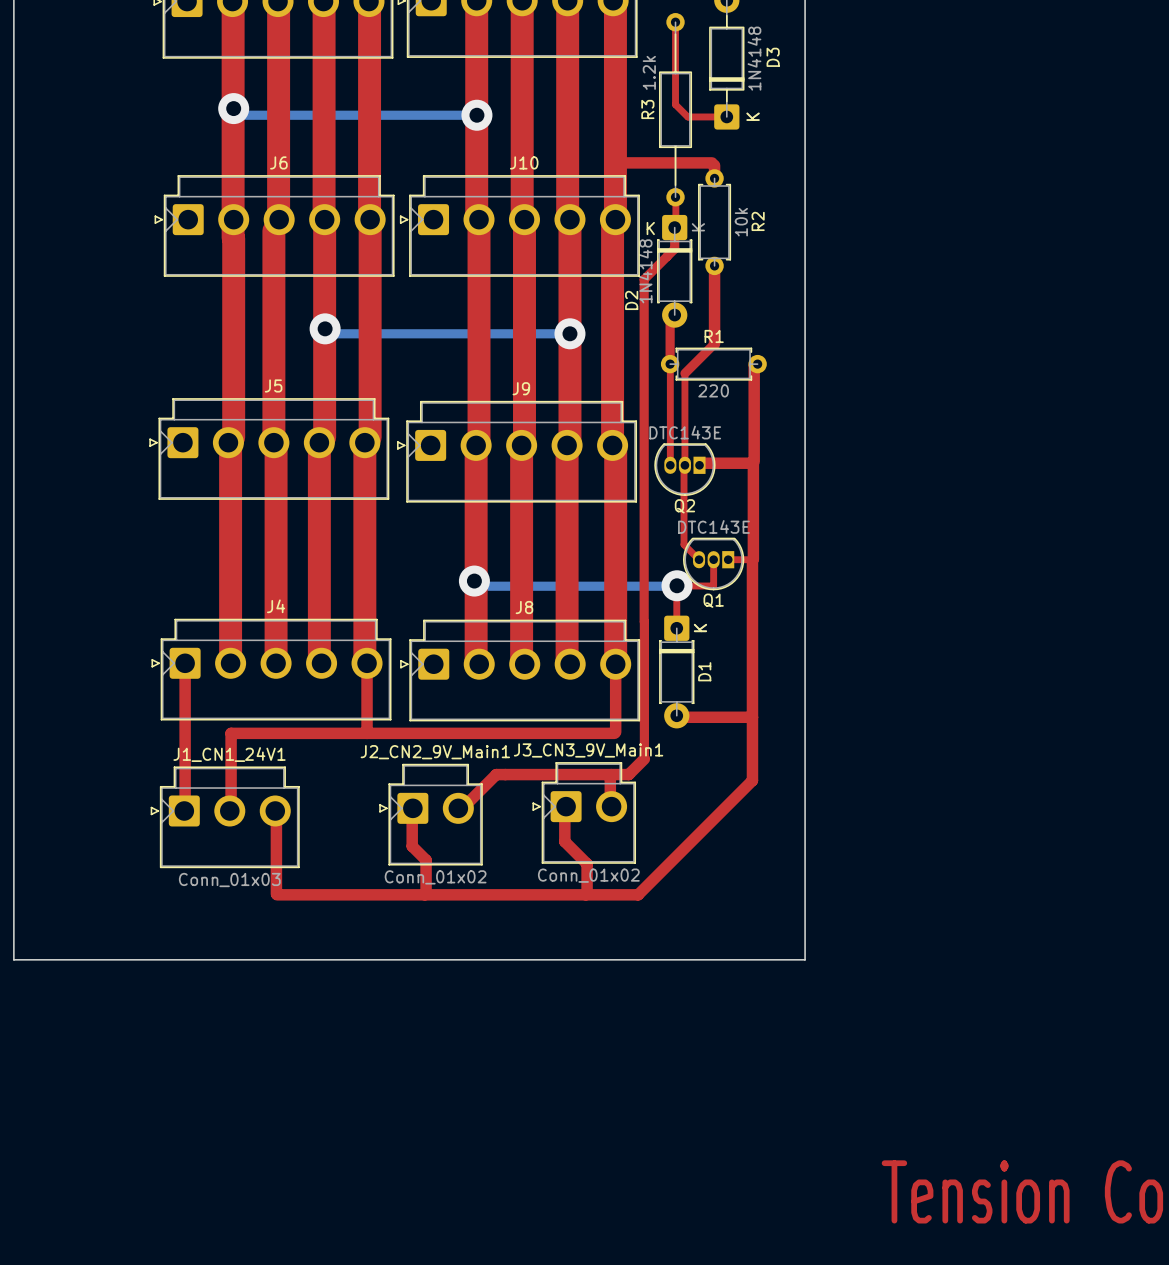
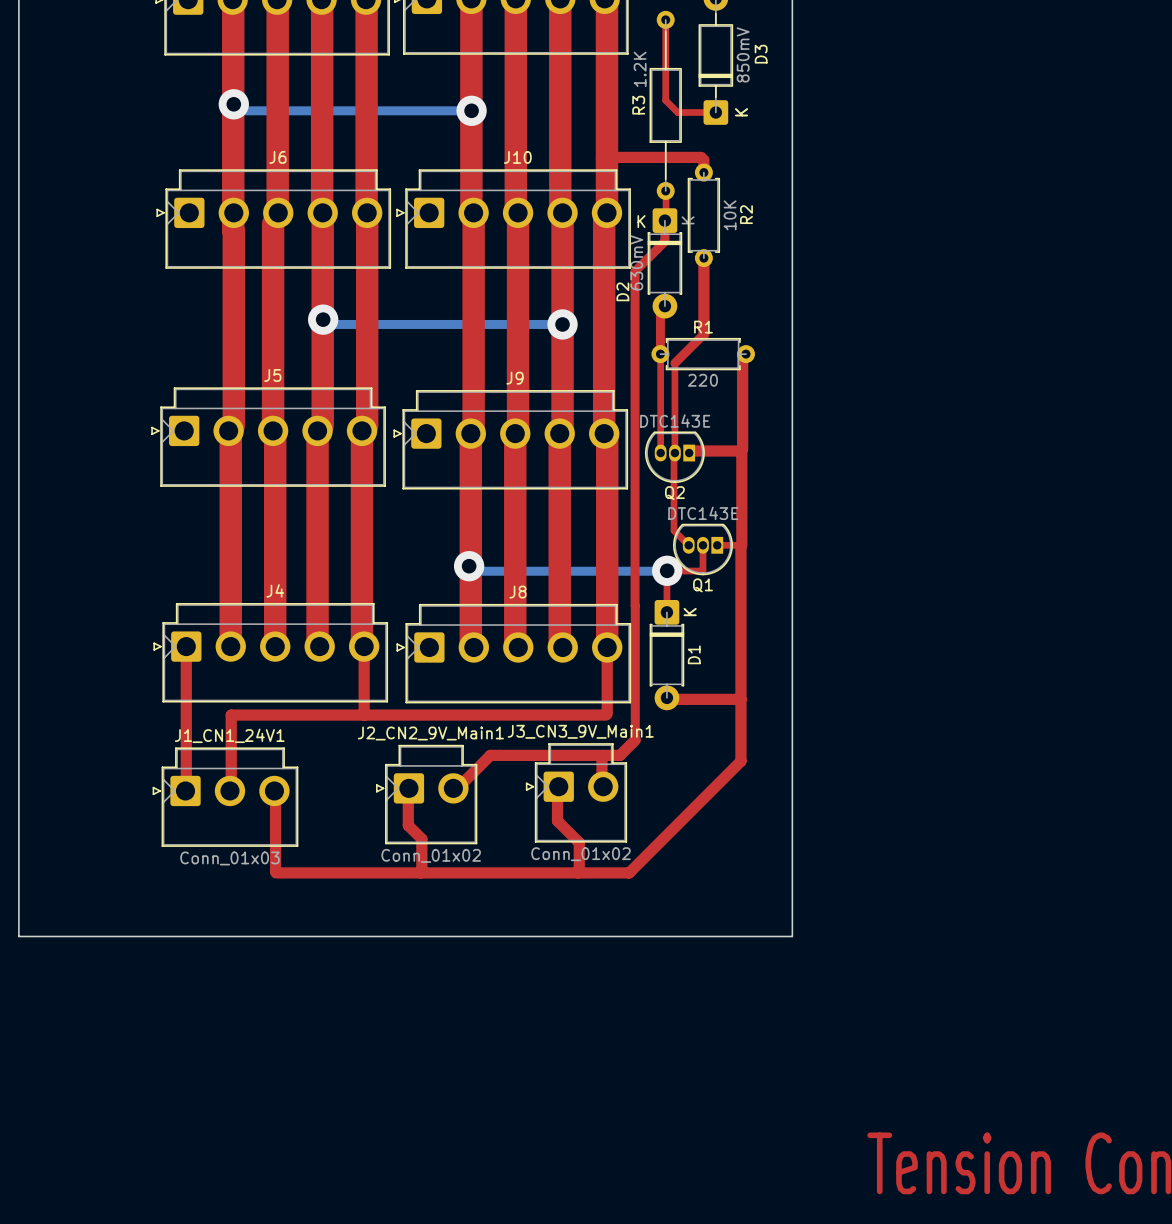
D3 value: 1N4148 (754, 58) -> 850mV (743, 54)
R3 value: 1.2k (649, 72) -> 1.2K (640, 69)
R2 value: 10k (741, 222) -> 10K (730, 215)
D2 value: 1N4148 (645, 271) -> 630mV (636, 262)

